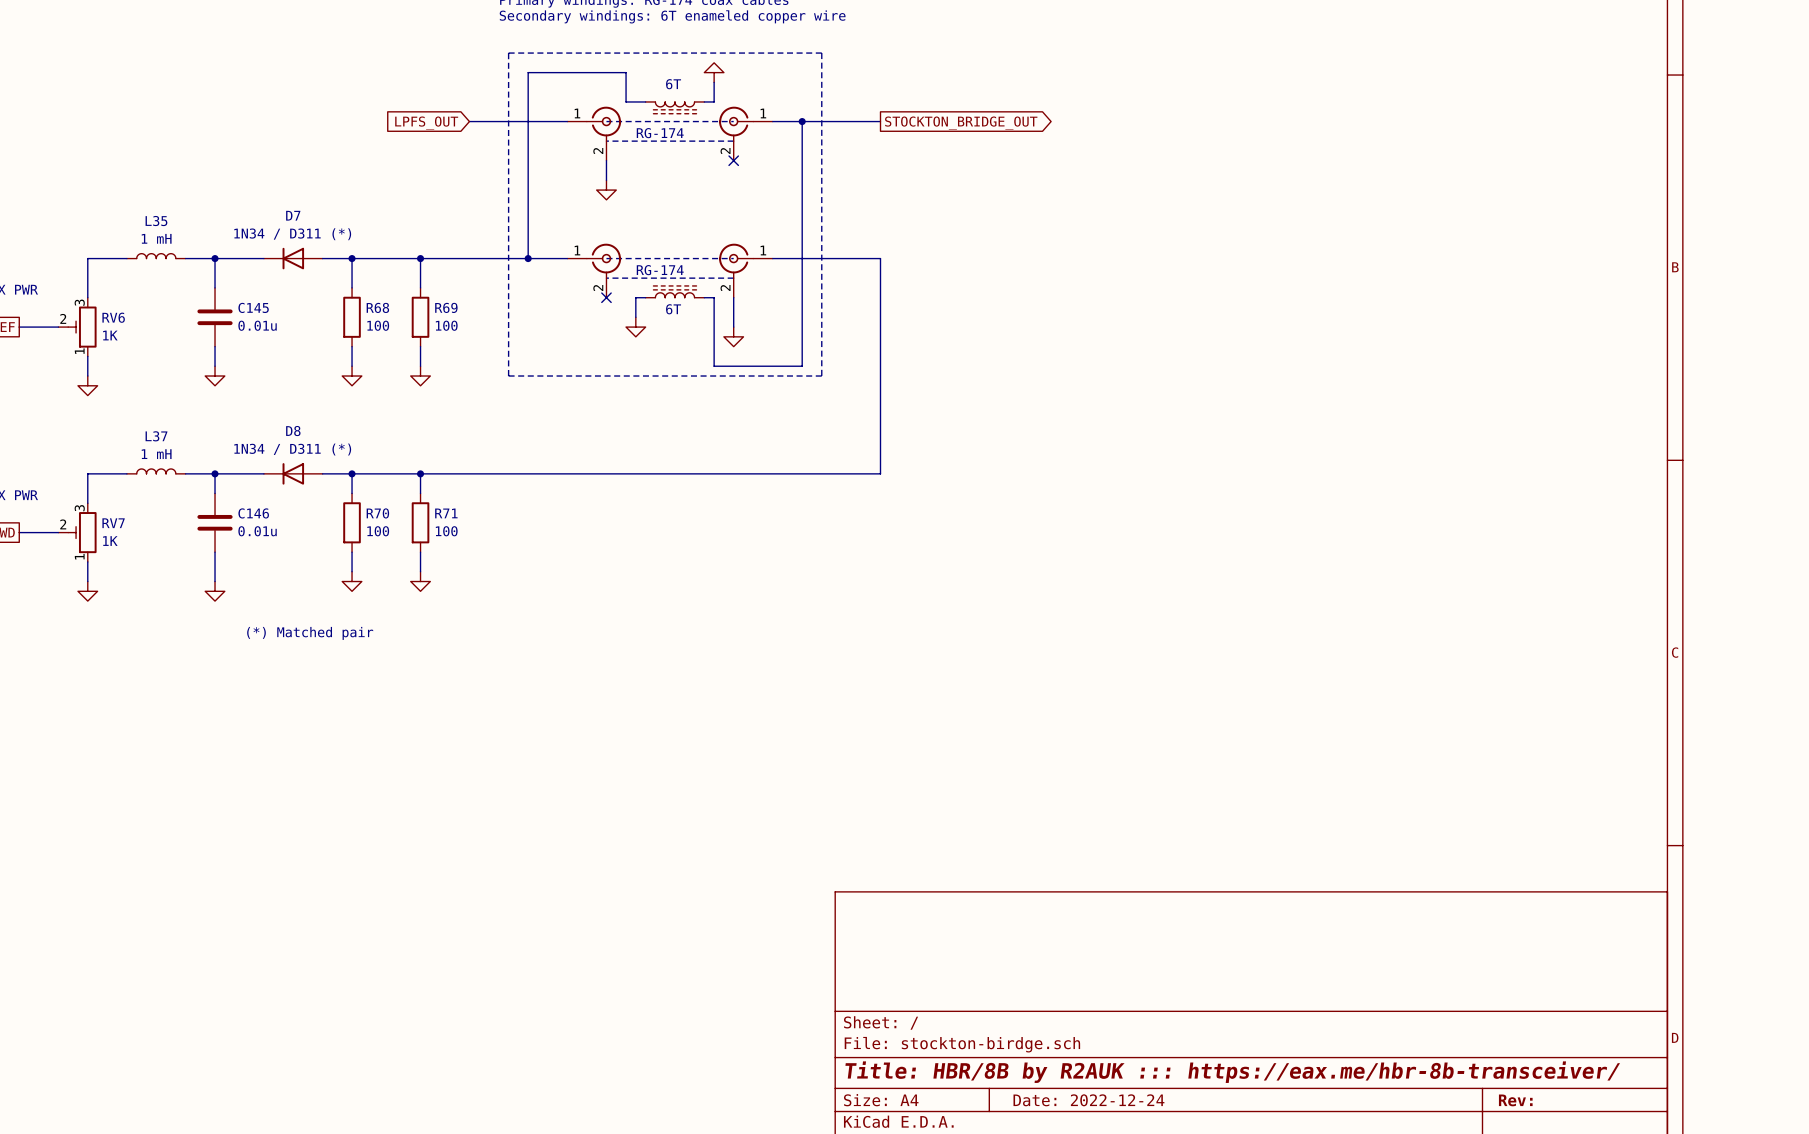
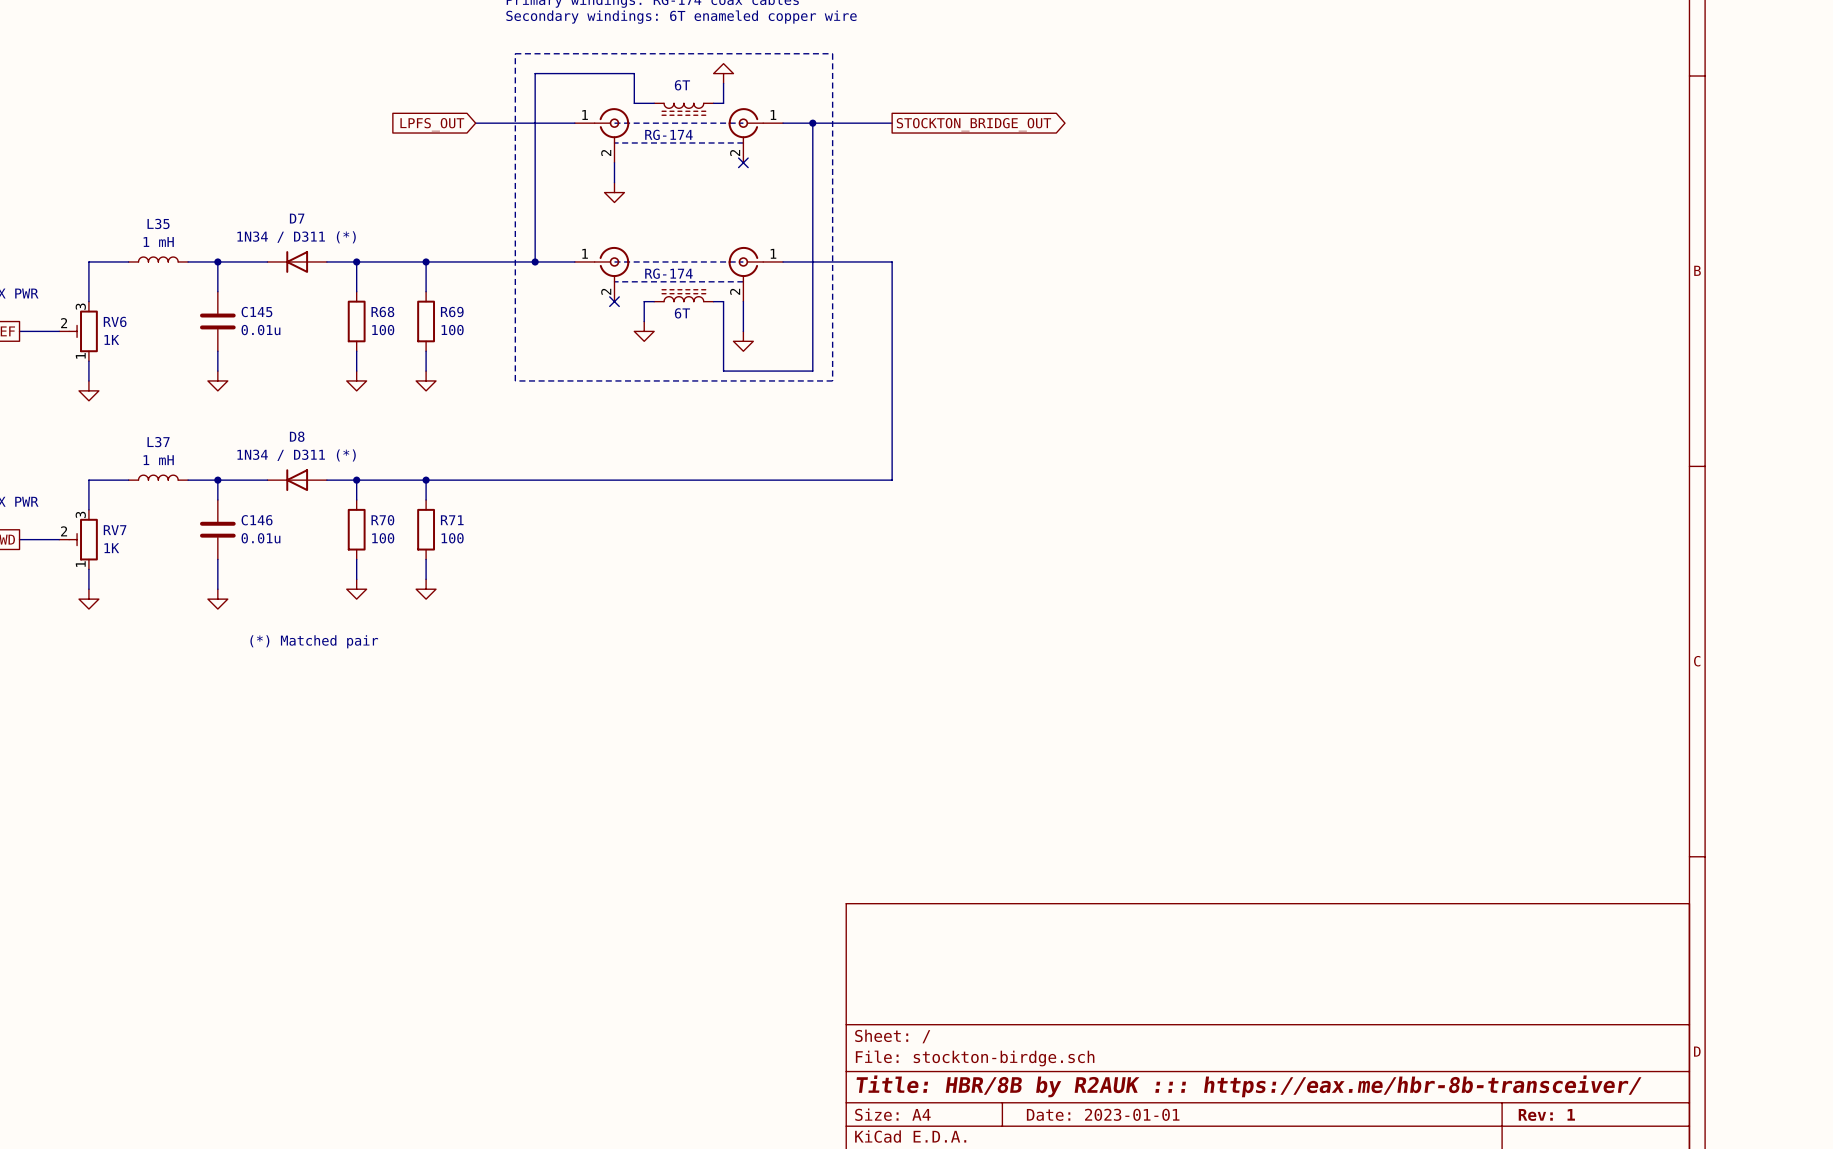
title block: Date: 2022-12-24 (1088, 1100) -> Date: 2023-01-01 (1103, 1114)
title block: Rev: (1515, 1100) -> Rev: 1 (1546, 1114)

